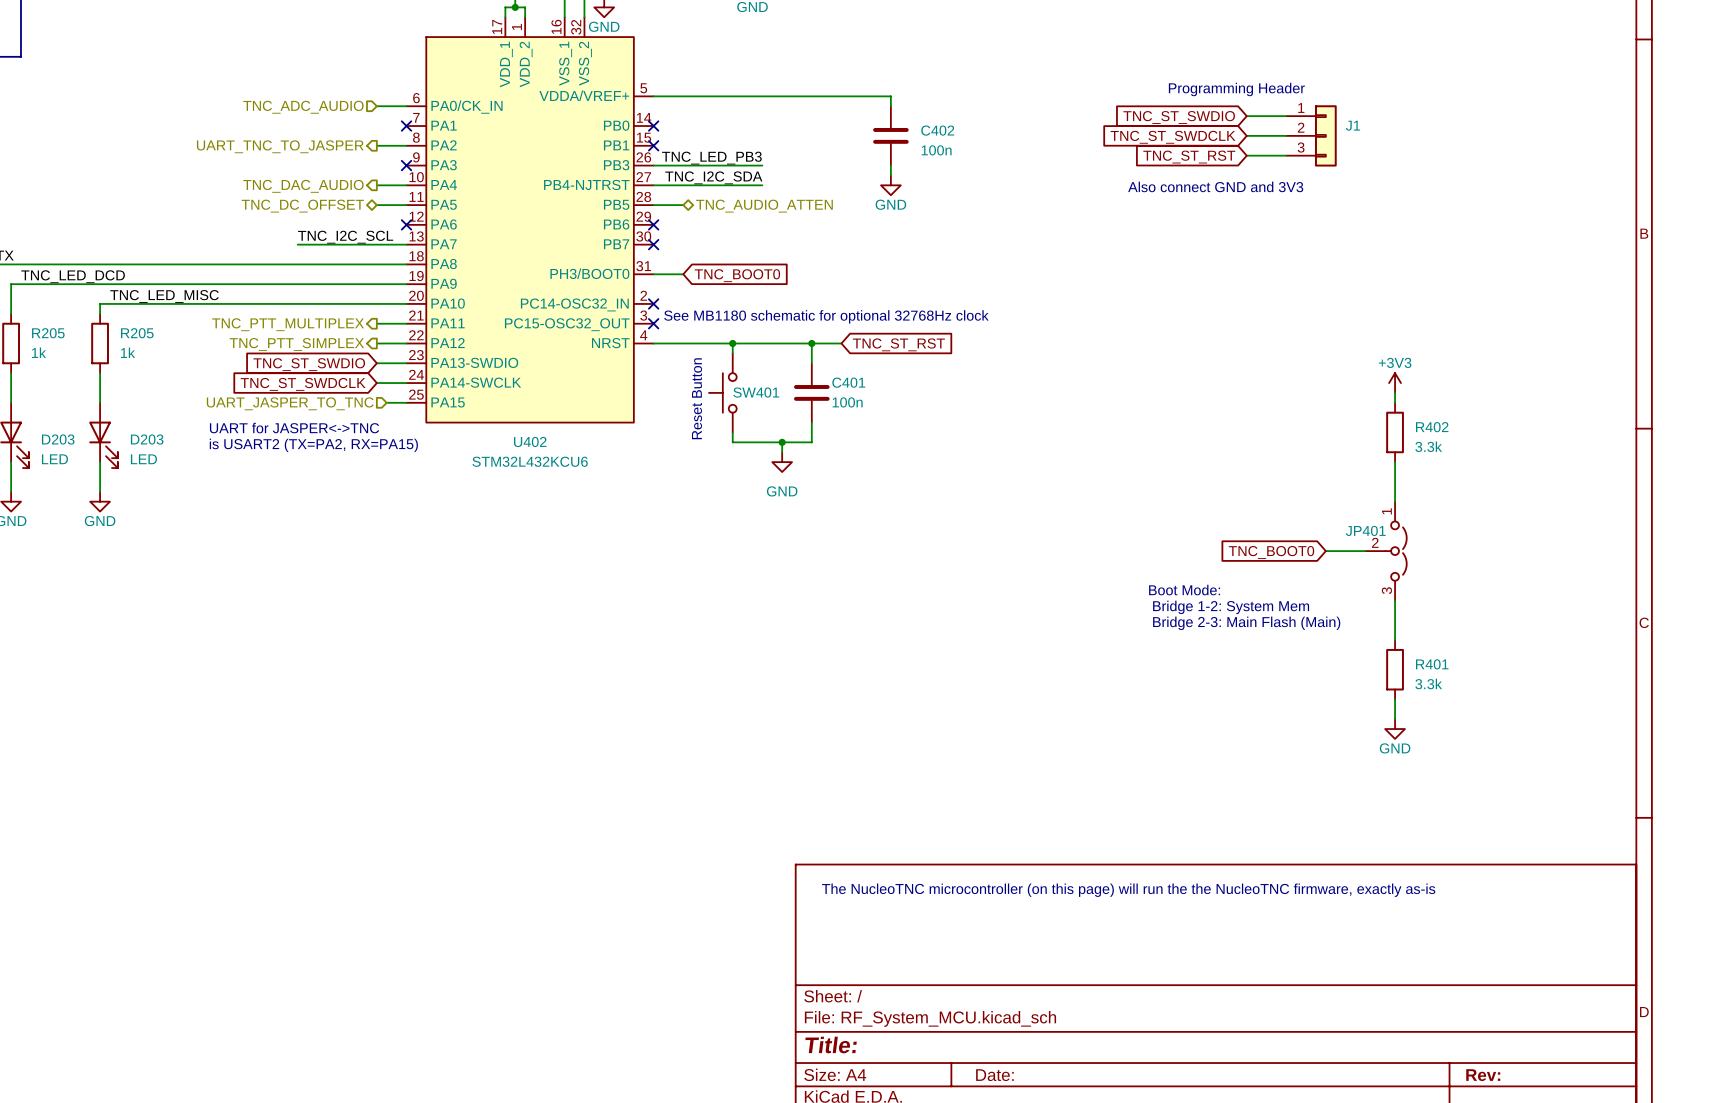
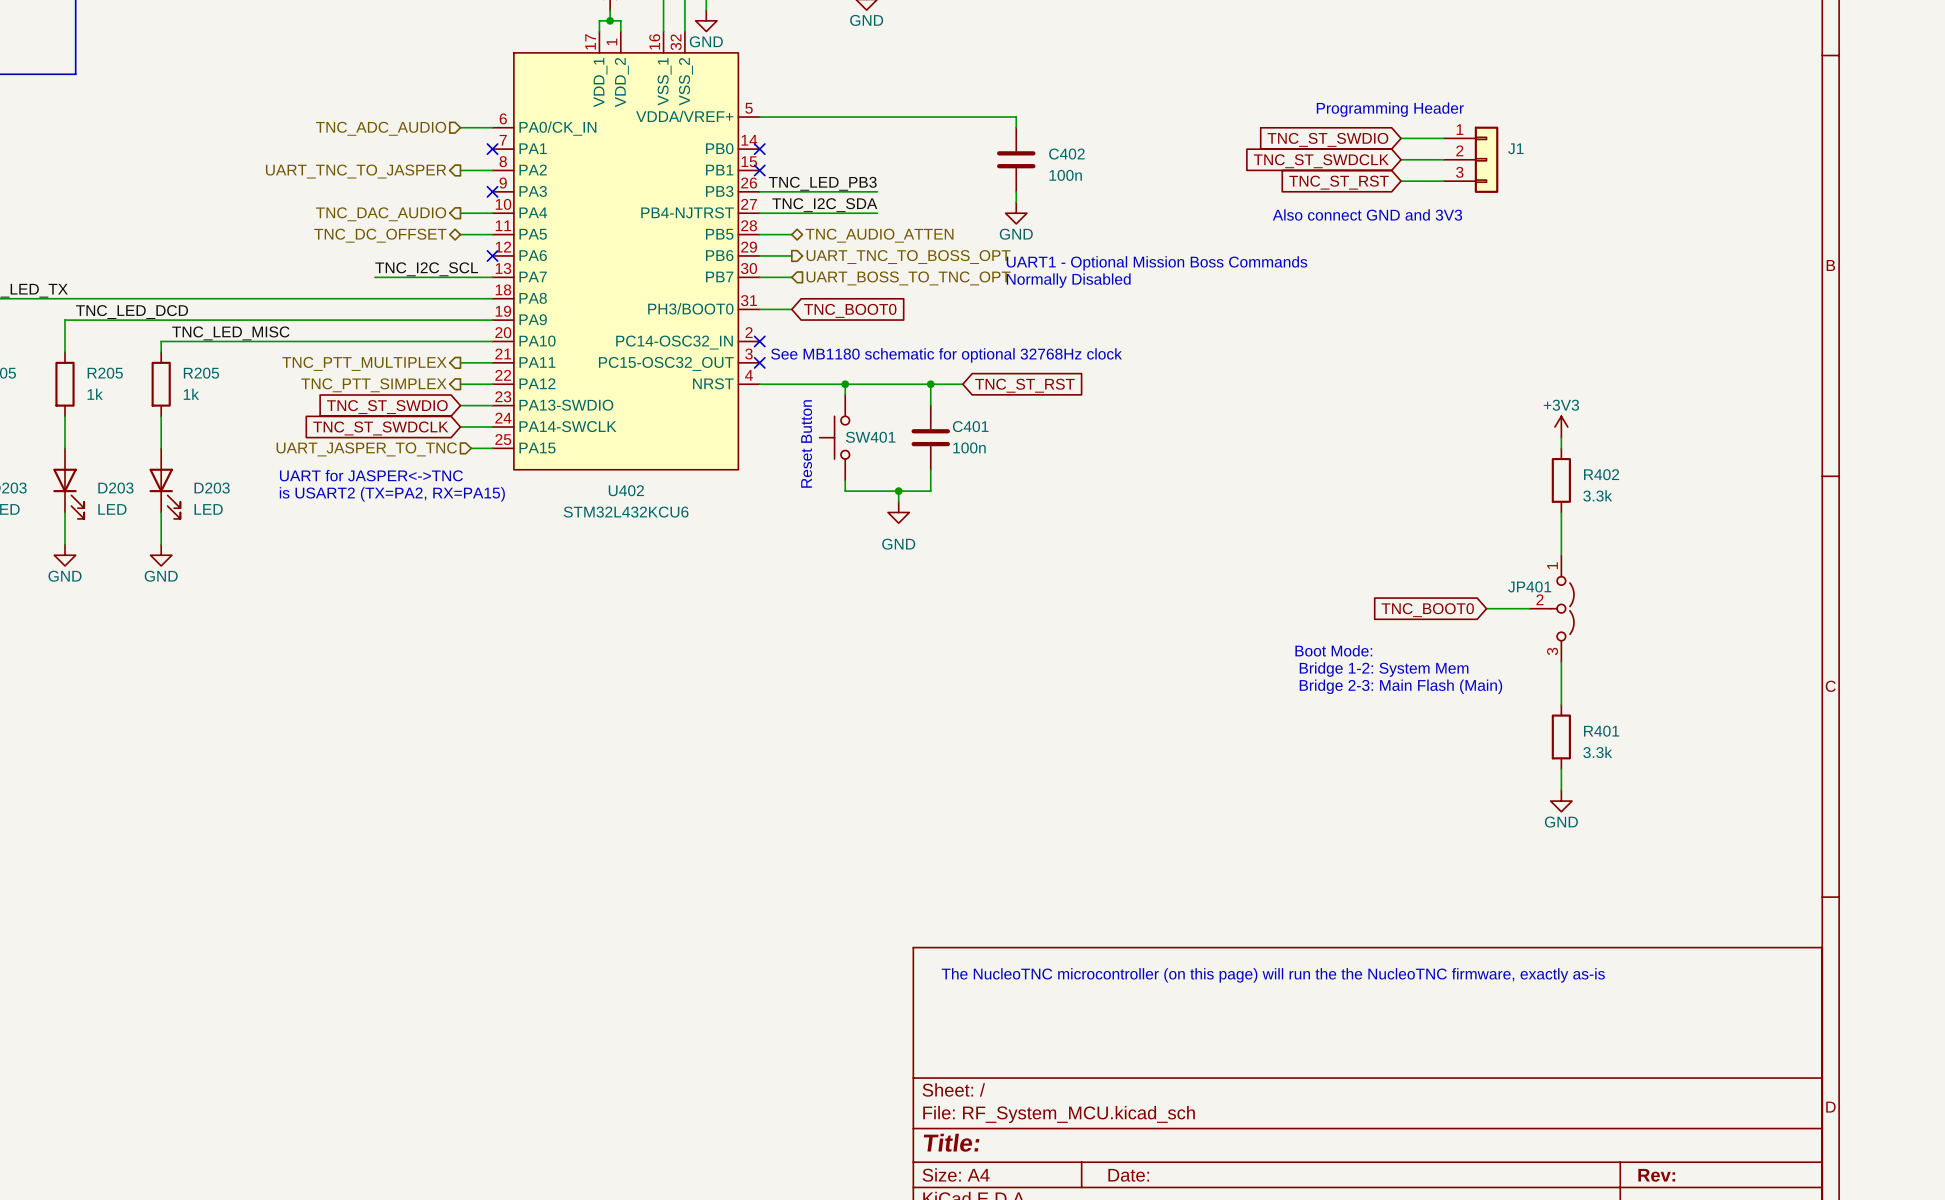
wire: none -> (759, 255) (791, 255)
no-connect mark: (653, 224) -> none
hierarchical label: none -> UART_TNC_TO_BOSS_OPT (908, 257)
text: none -> UART1 - Optional Mission Boss Commands (1156, 263)
wire: none -> (759, 277) (791, 277)
no-connect mark: (653, 244) -> none
hierarchical label: none -> UART_BOSS_TO_TNC_OPT (908, 278)
text: none -> Normally Disabled (1068, 280)

